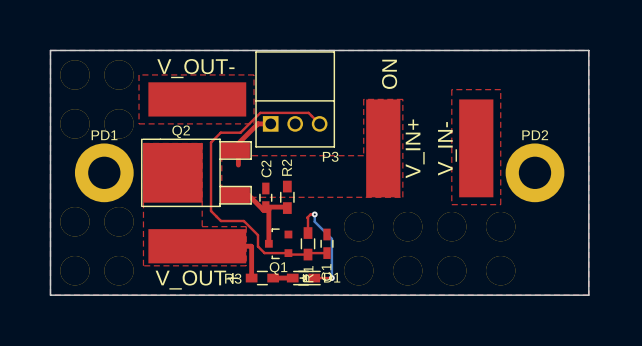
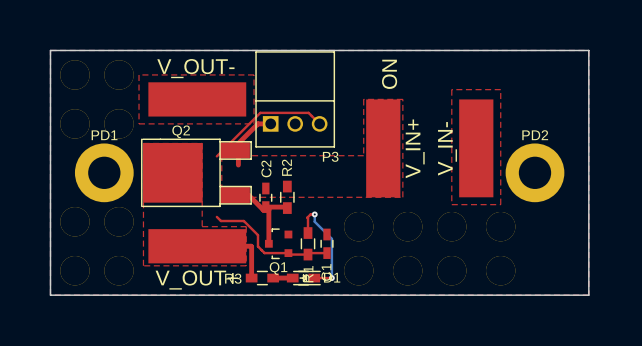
top track: (240, 132) (220, 132) (211, 142) (211, 211) (216, 216) -> (240, 132) (216, 156)

